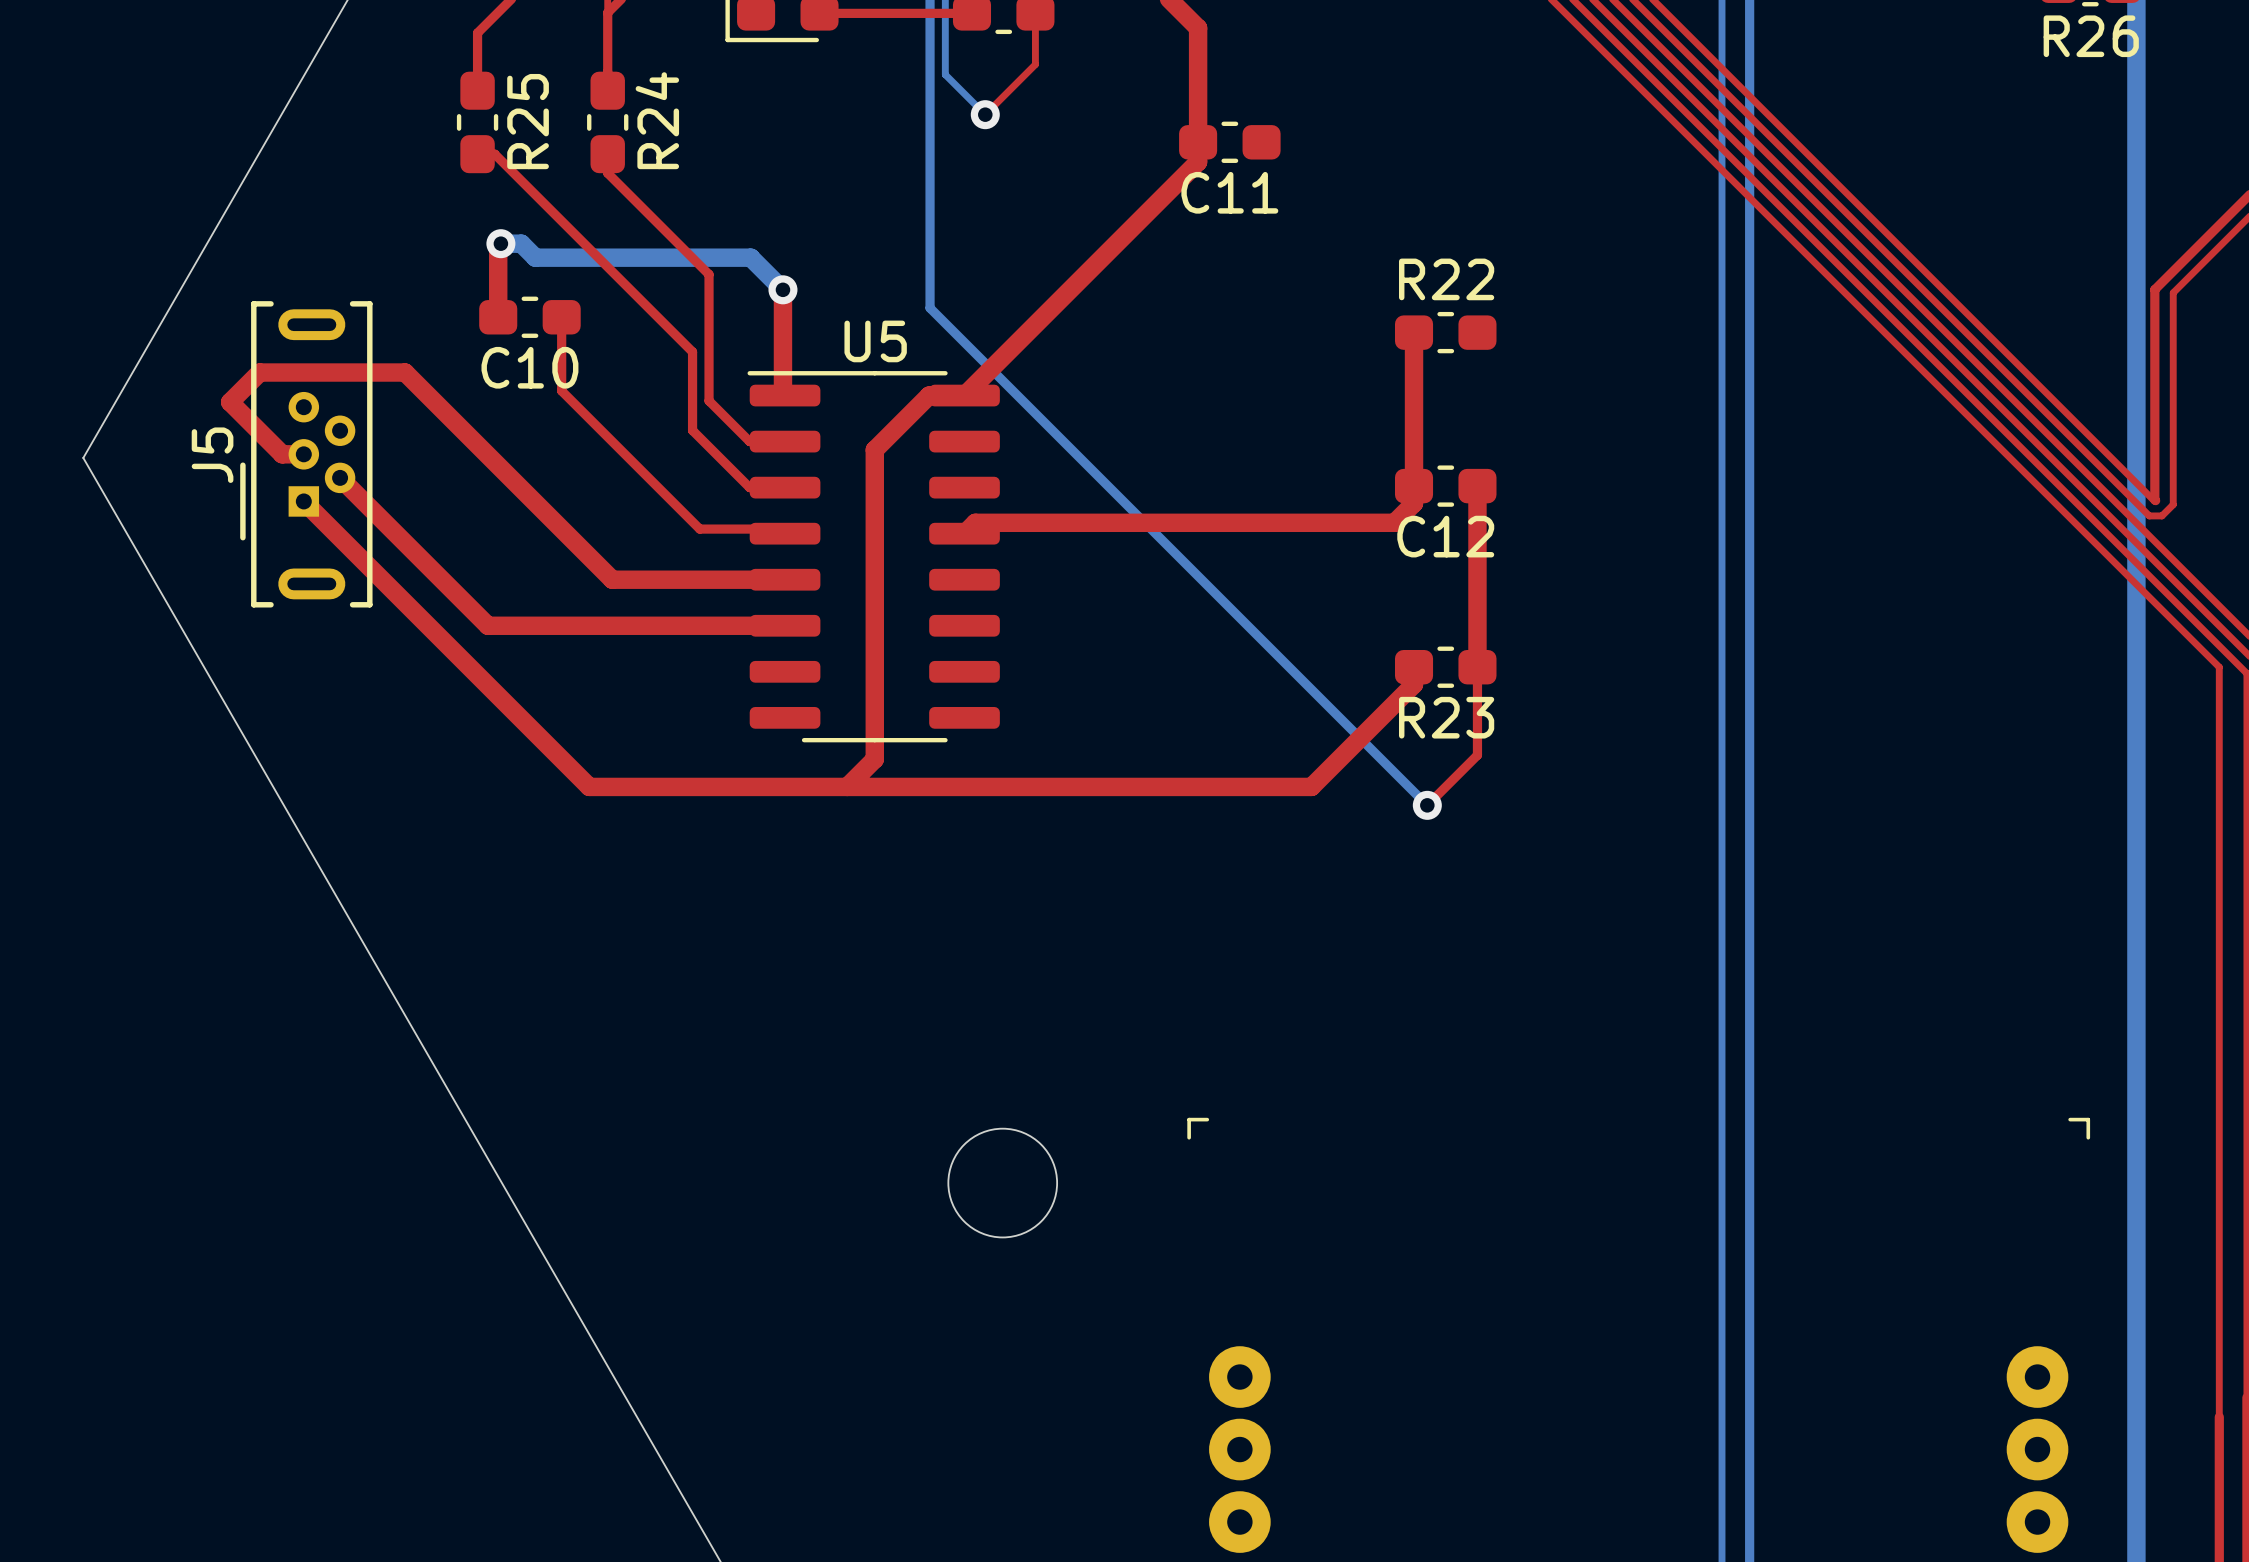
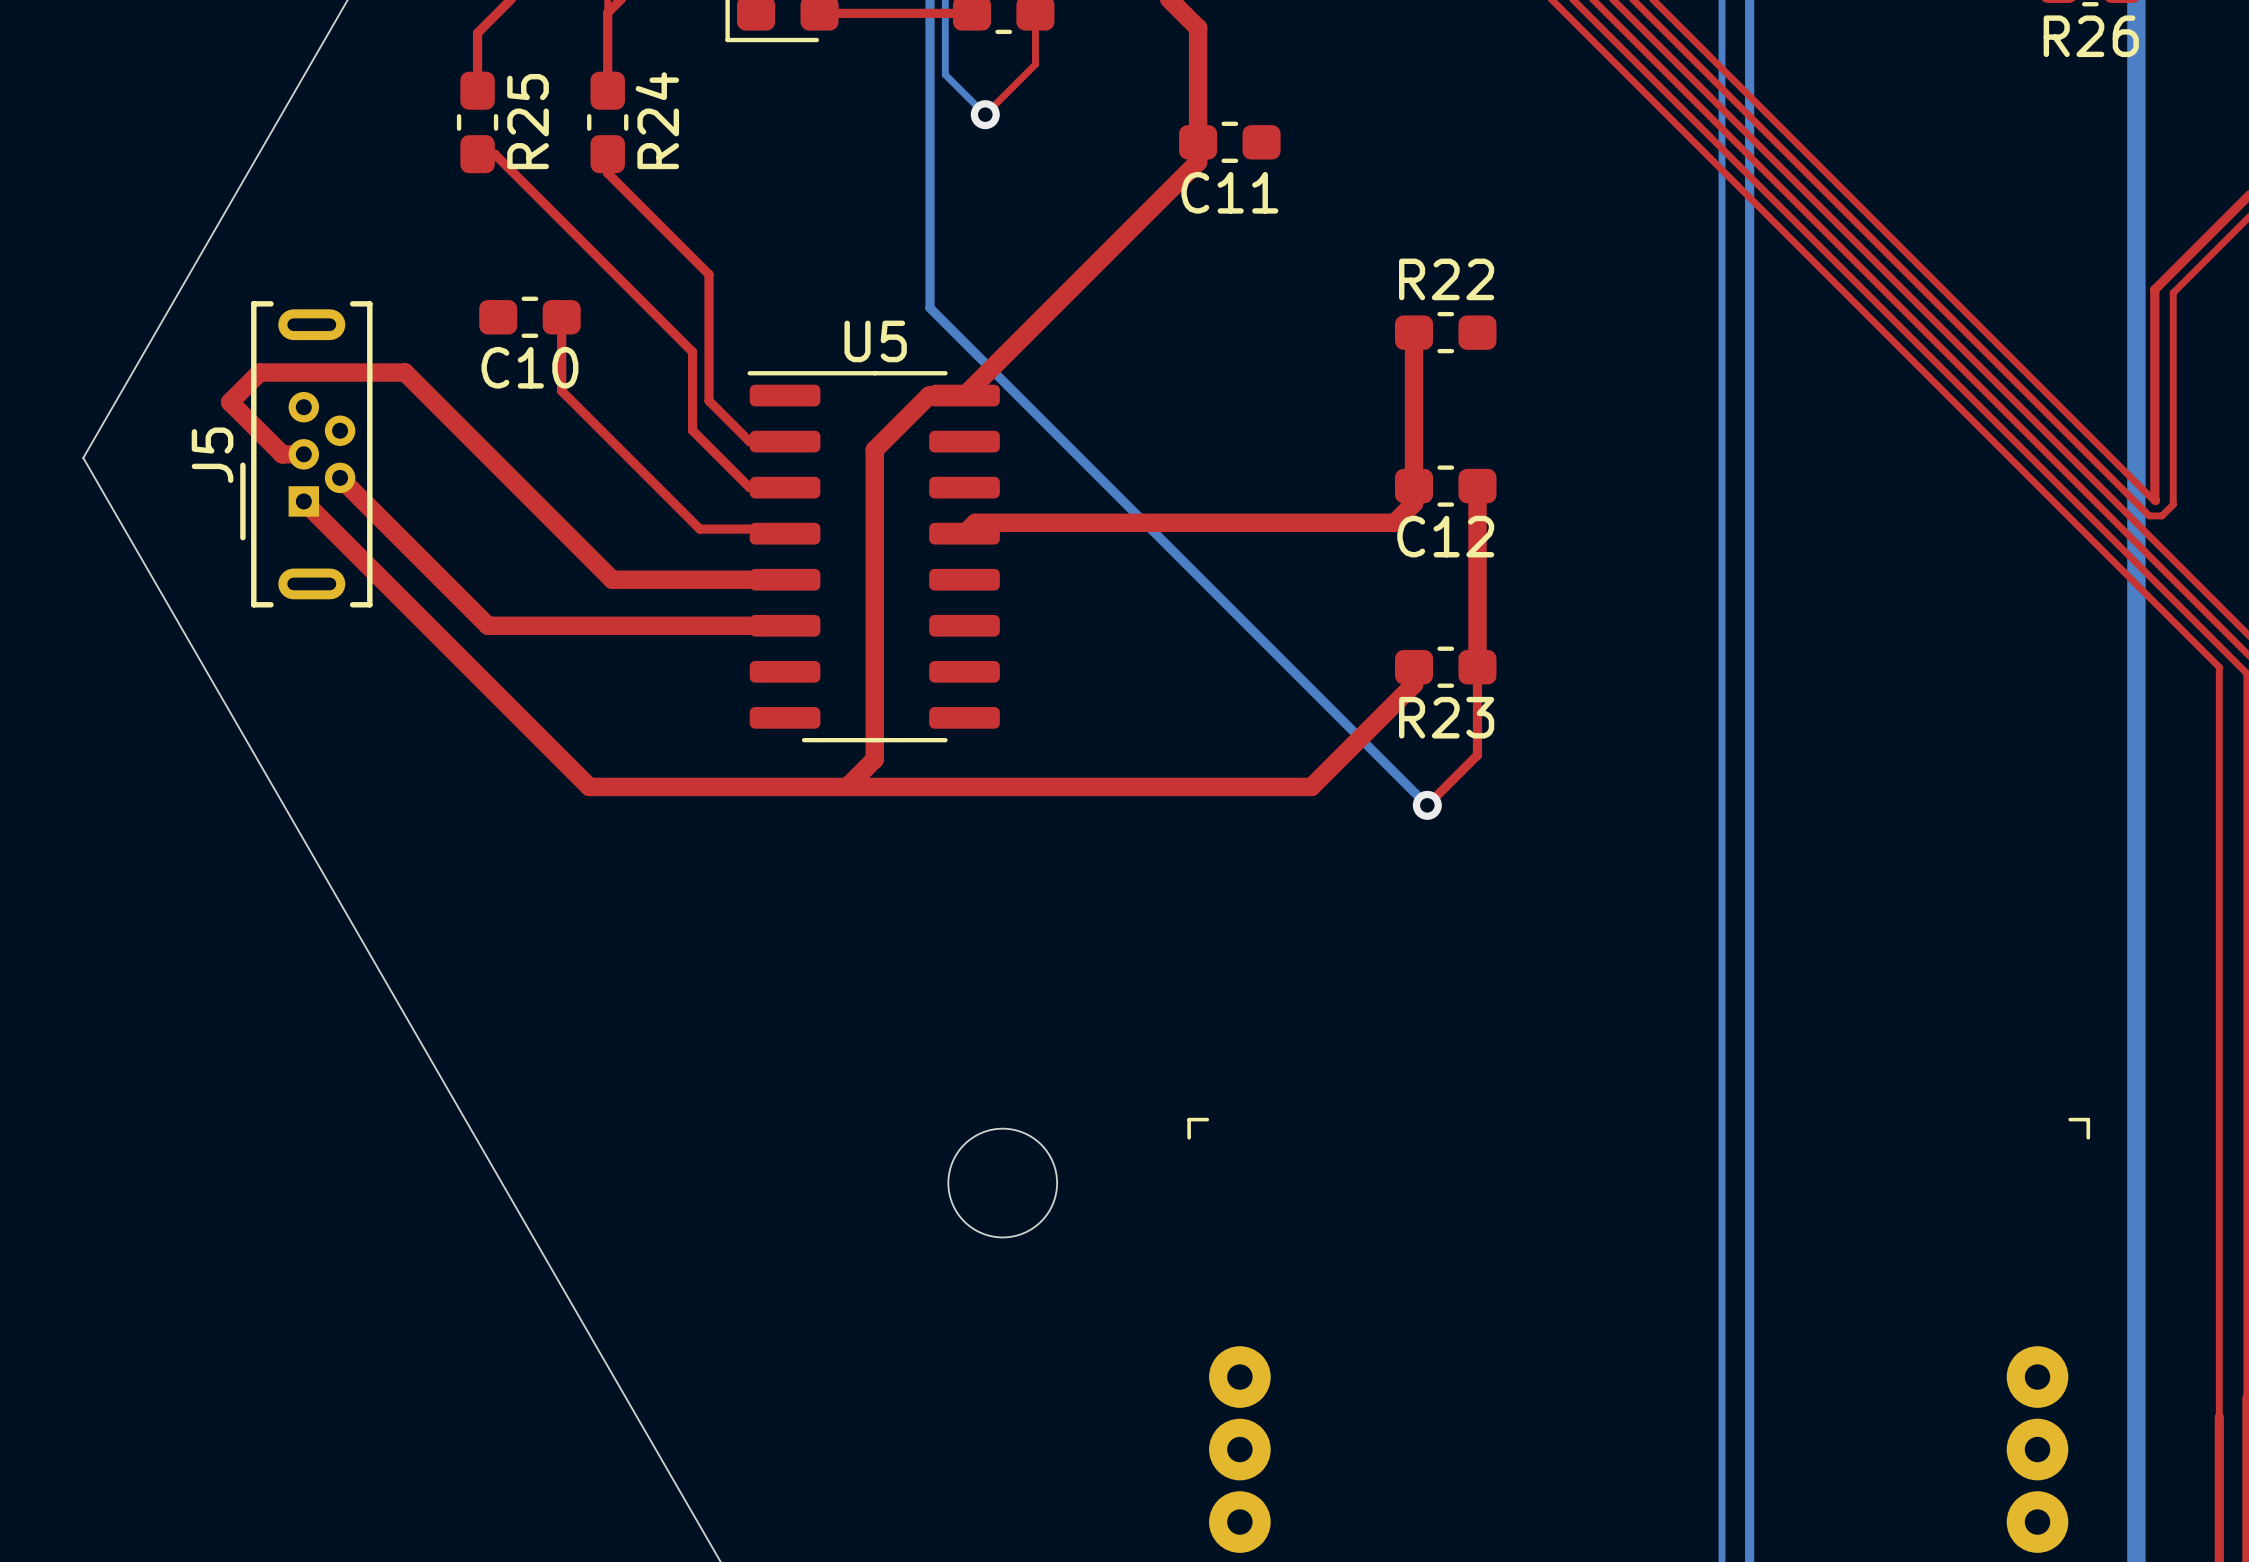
top track: (500, 243) (498, 246) (498, 317) -> none
bottom track: (500, 243) (521, 243) (535, 257) (750, 257) (782, 289) -> none
via: (500, 243) -> none
top track: (782, 289) (782, 393) (785, 395) -> none
via: (782, 289) -> none

